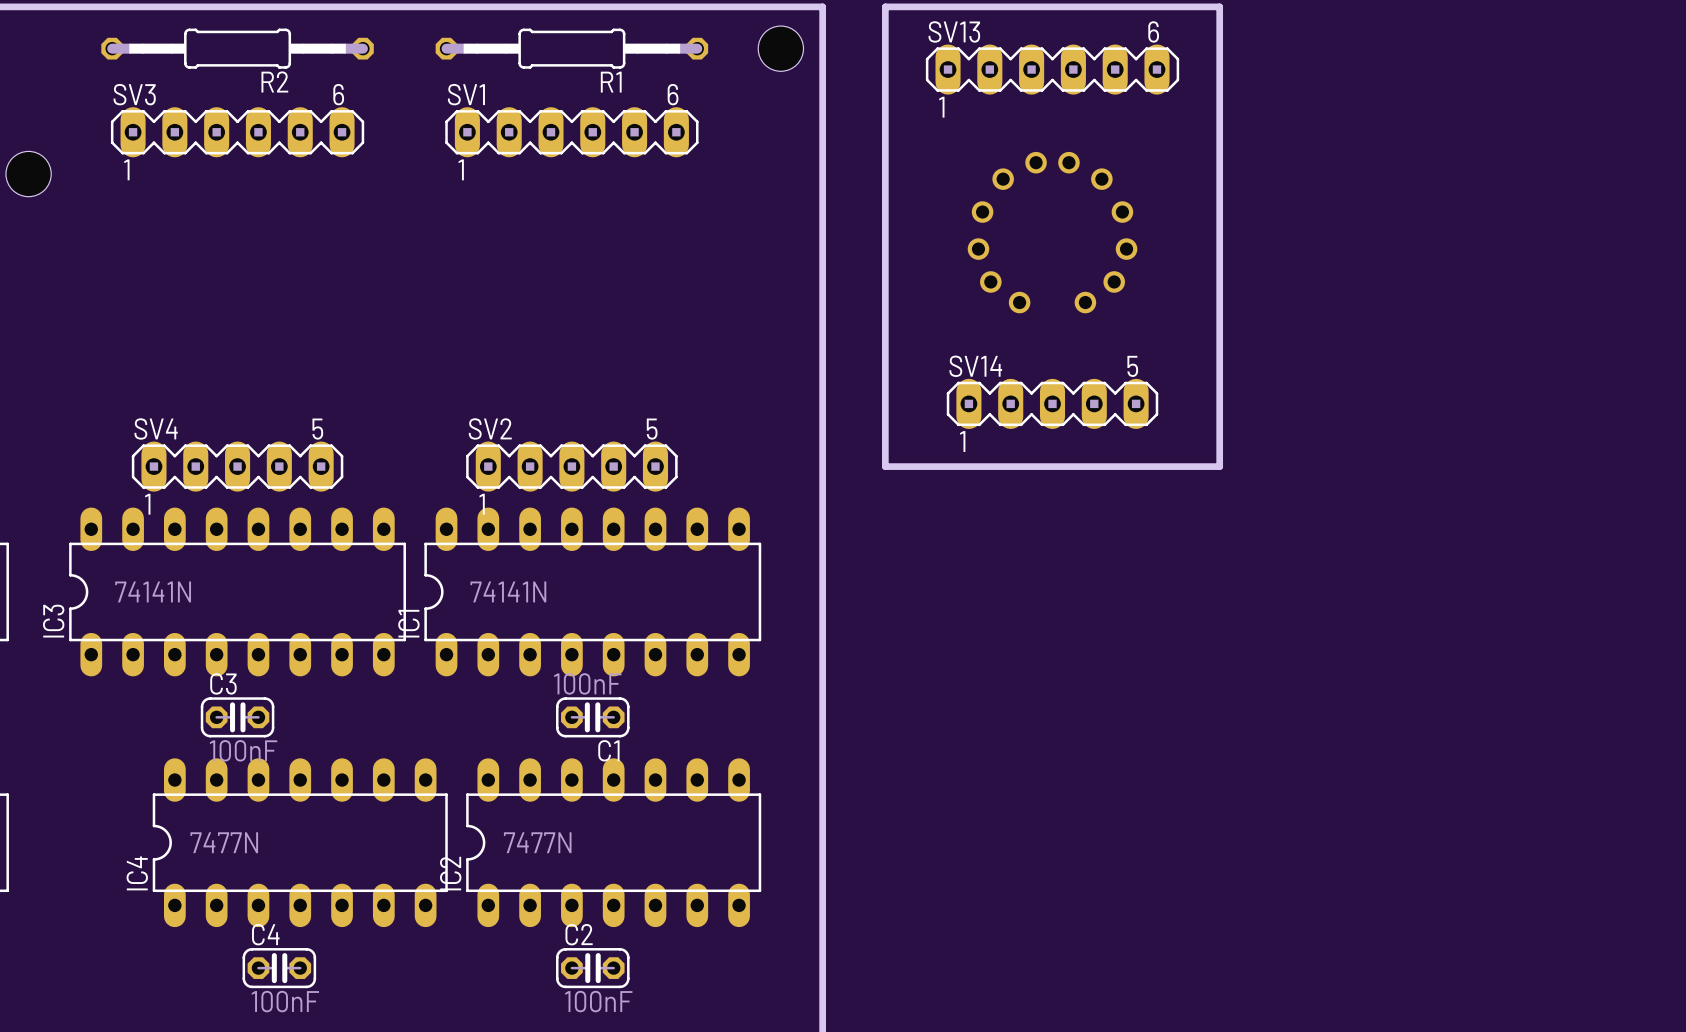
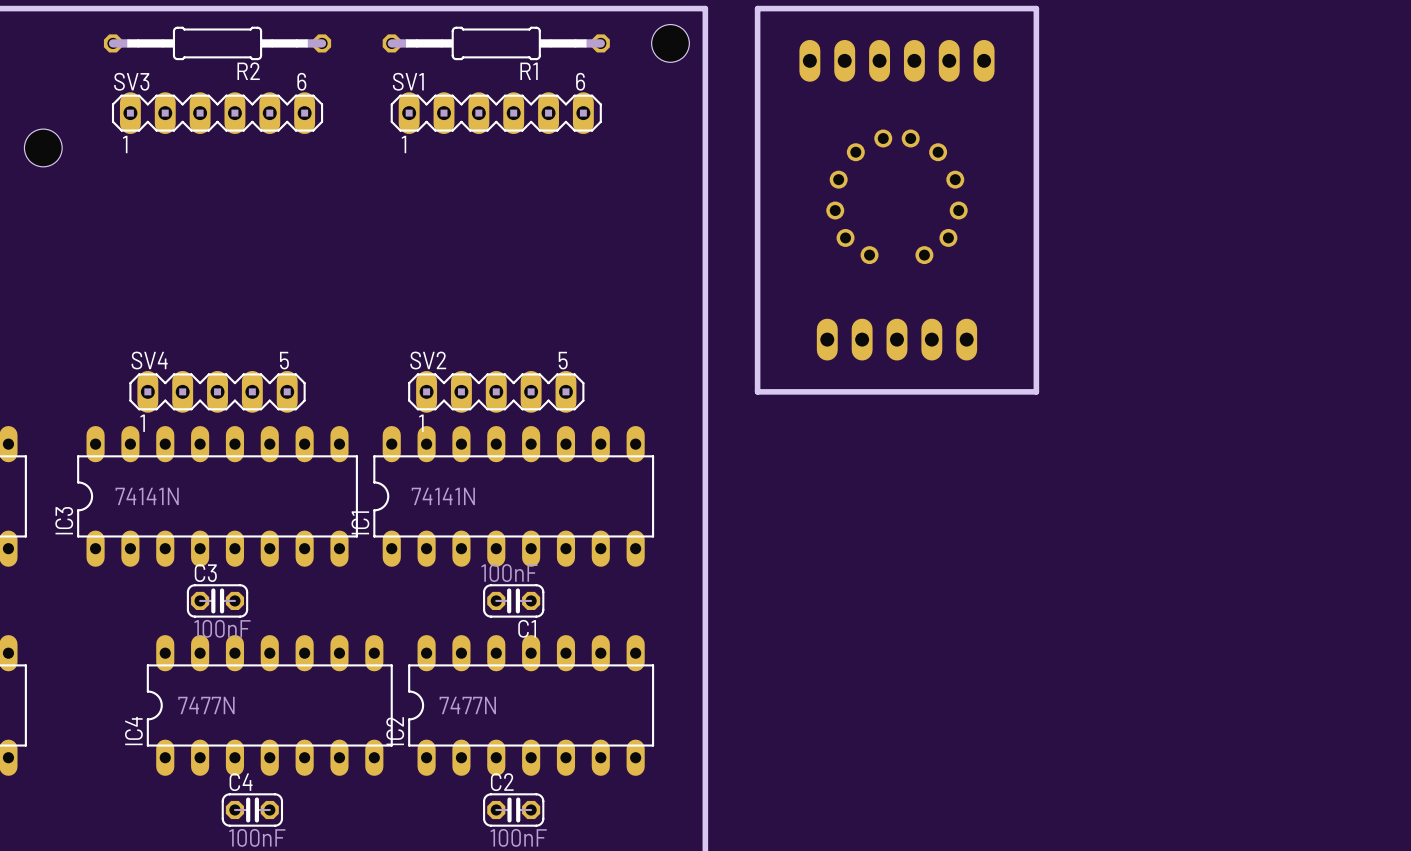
SV13 side: top (1052, 69) -> bottom (896, 60)
SV14 side: top (1052, 403) -> bottom (896, 339)

